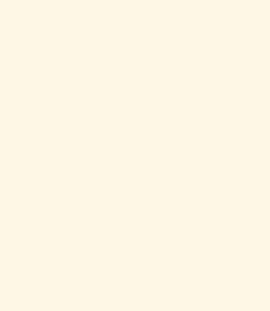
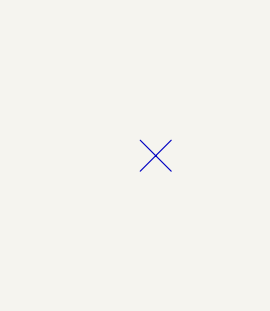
no-connect mark: none -> (155, 155)

